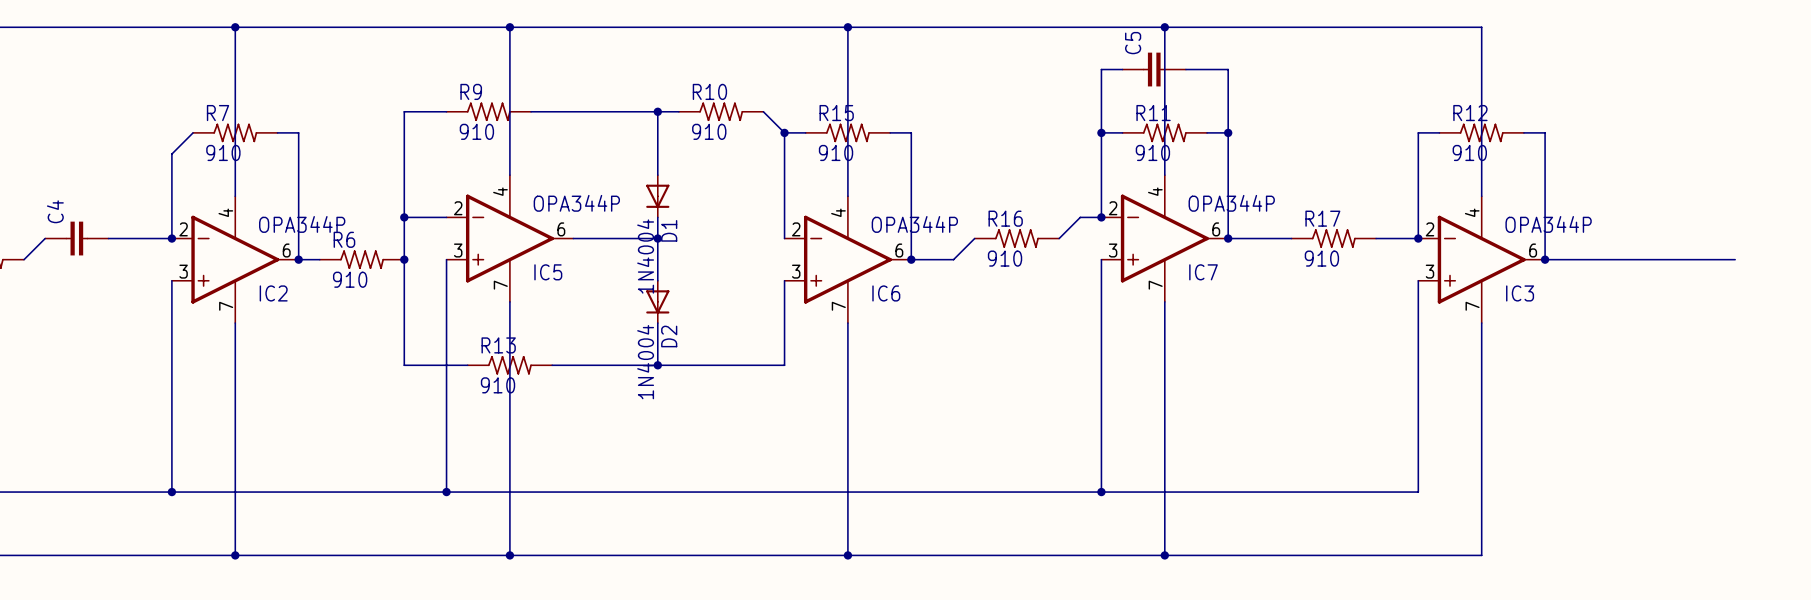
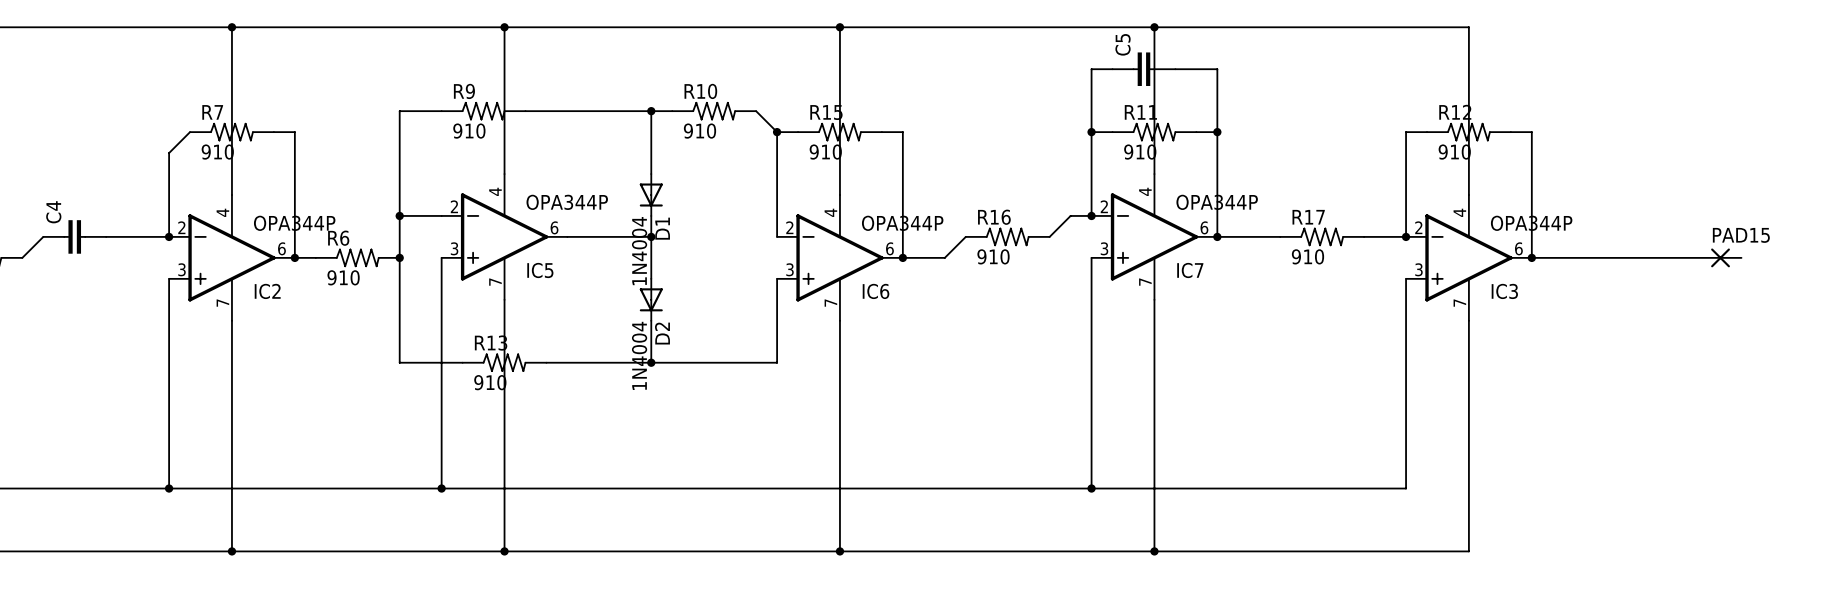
PAD15: none -> (1726, 257)

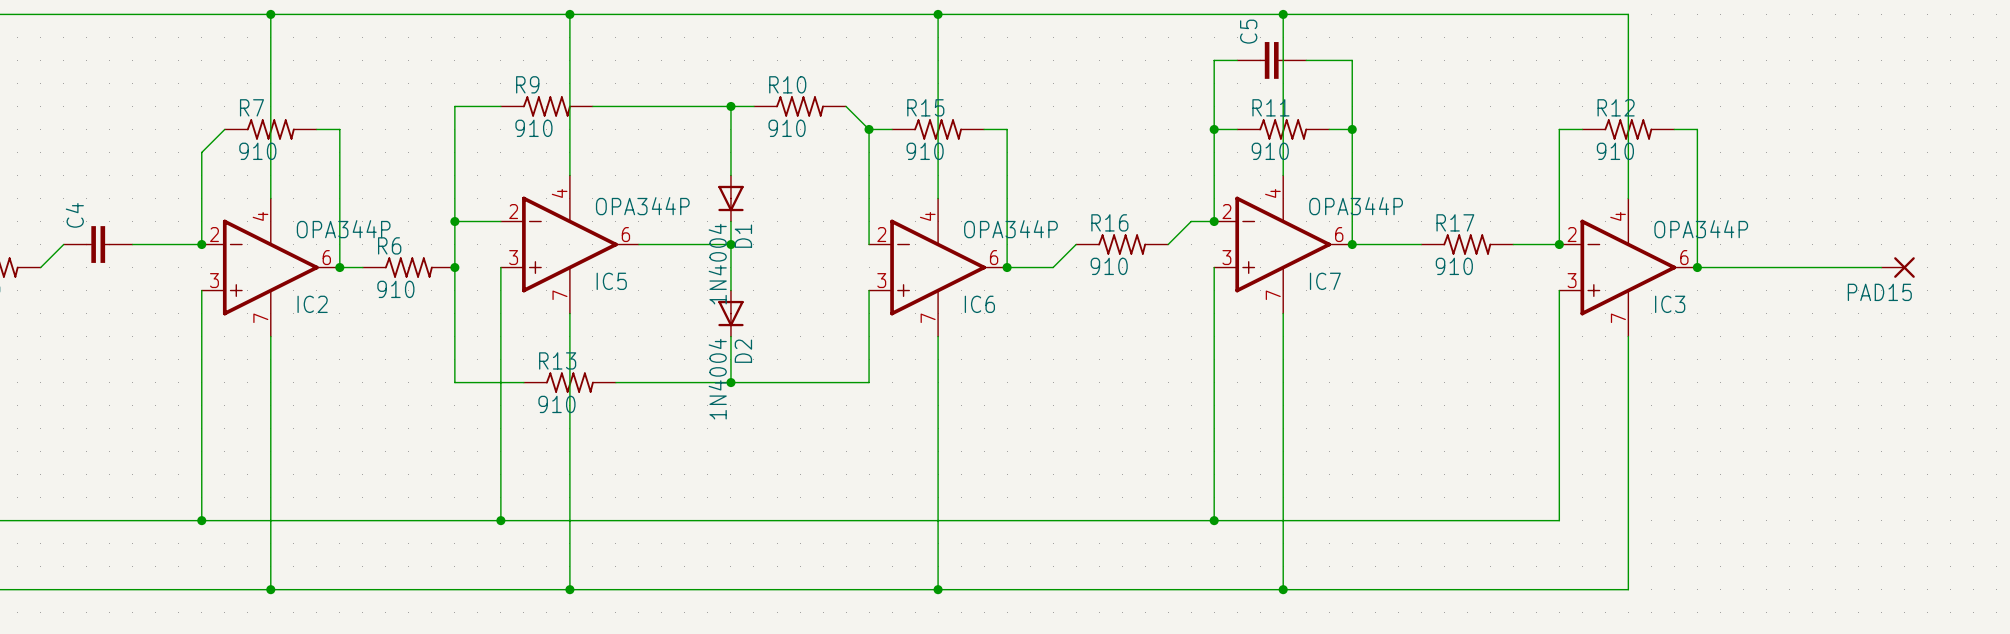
PAD15 rotation: 0° (1720, 257) -> 180° (1904, 267)

